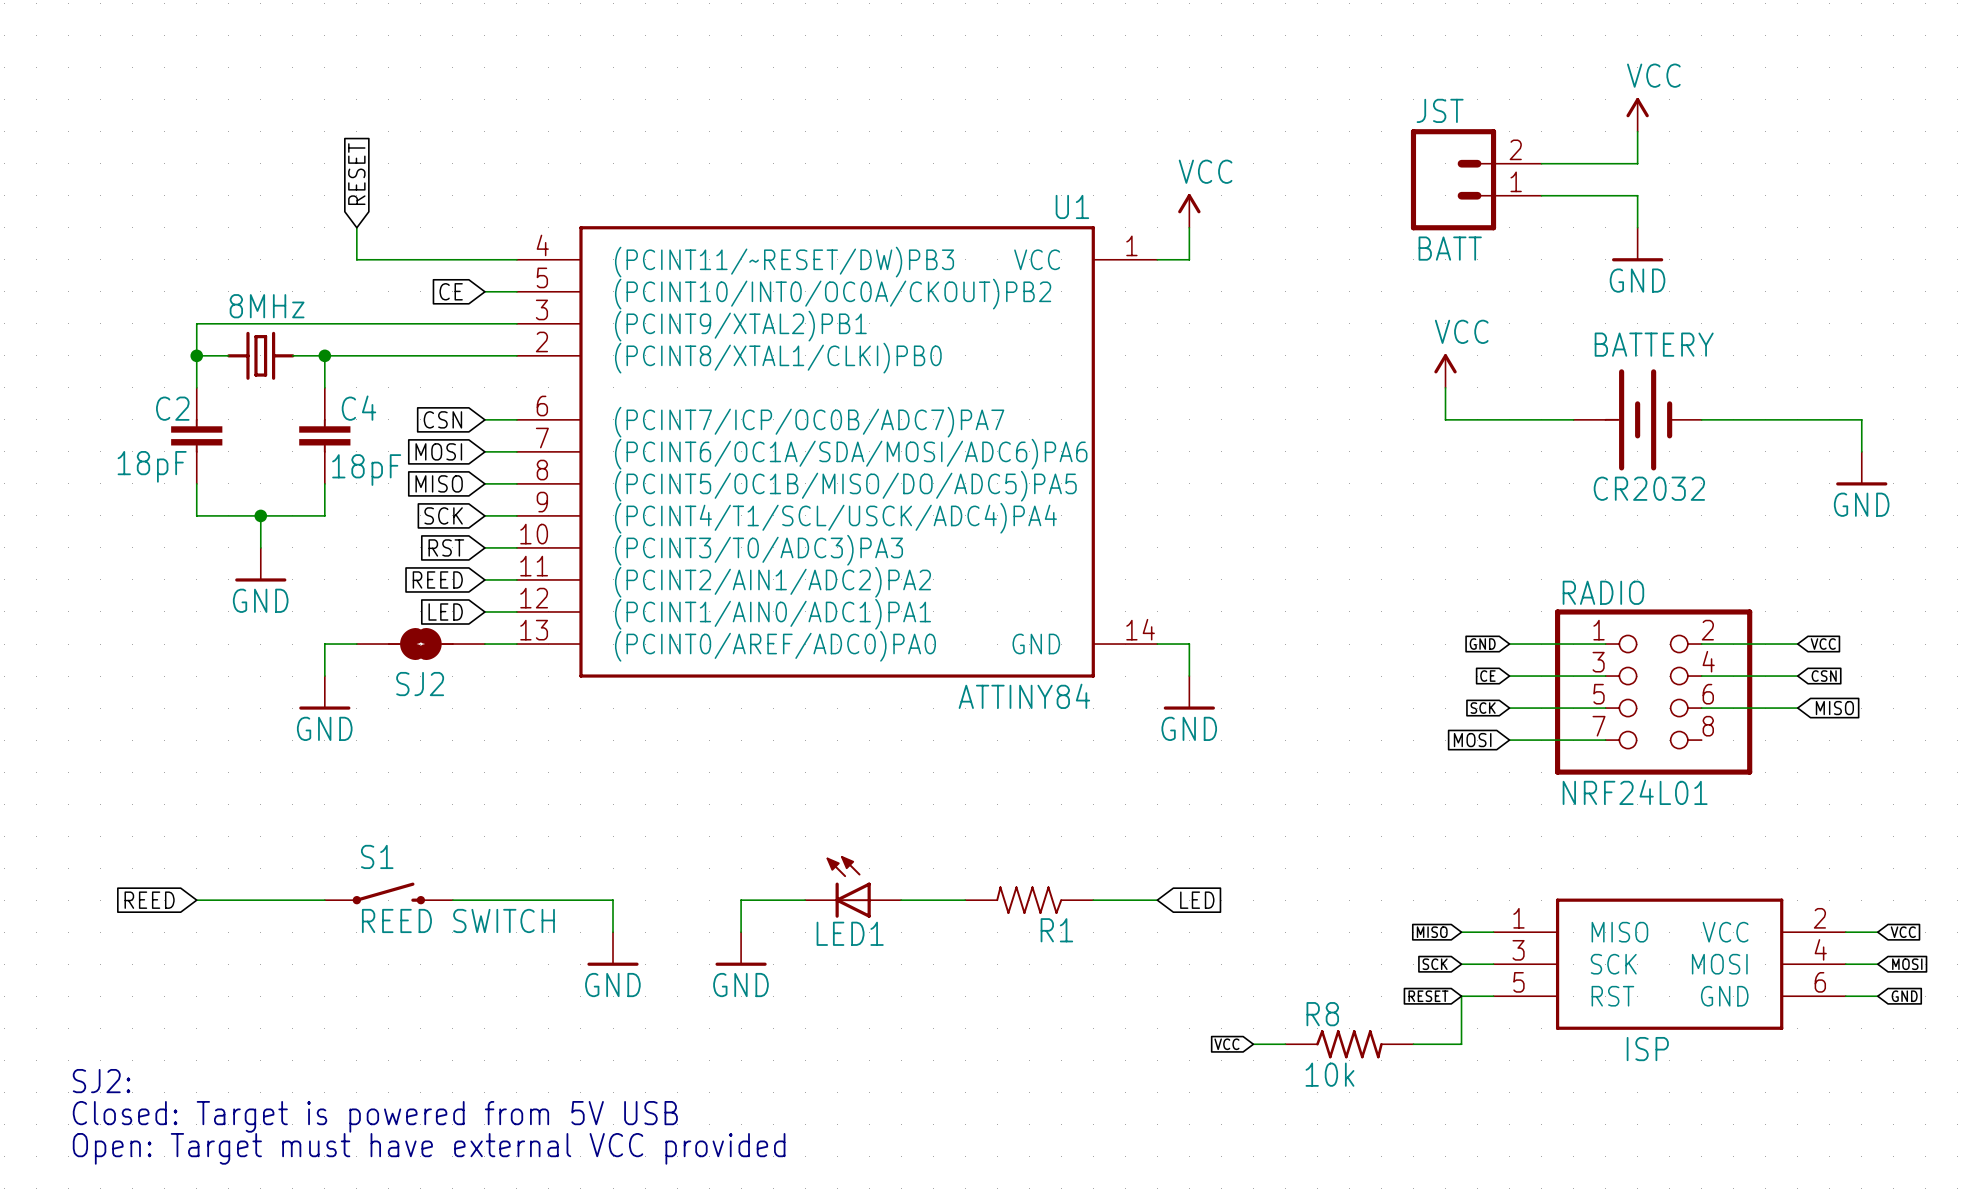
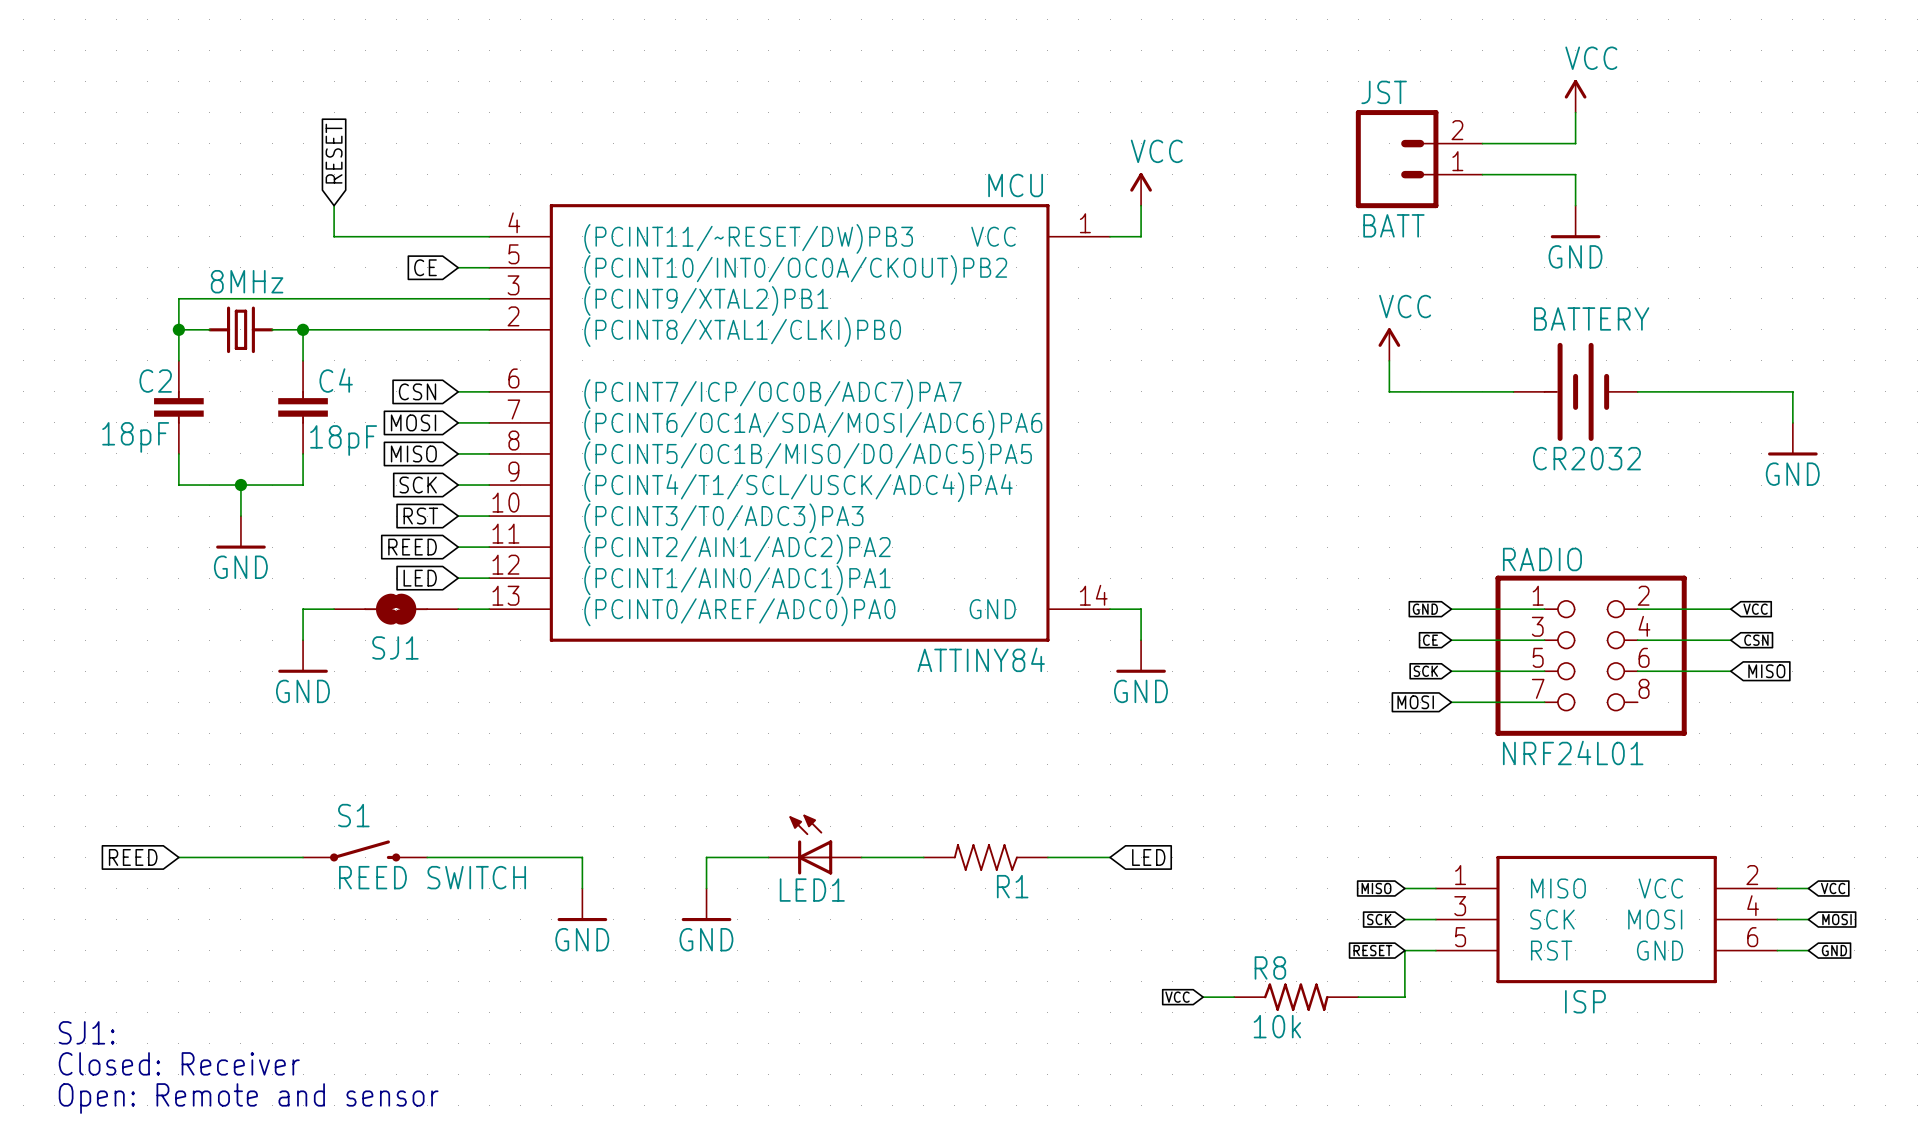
U1 name: U1 (1072, 206) -> MCU (1015, 185)
SJ2 name: SJ2 (420, 684) -> SJ1 (395, 647)
text: SJ2: (101, 1081) -> SJ1: (86, 1032)
text: Closed: Target is powered from 5V USB (375, 1116) -> Closed: Receiver (179, 1063)
text: Open: Target must have external VCC provided (429, 1148) -> Open: Remote and sensor (248, 1098)

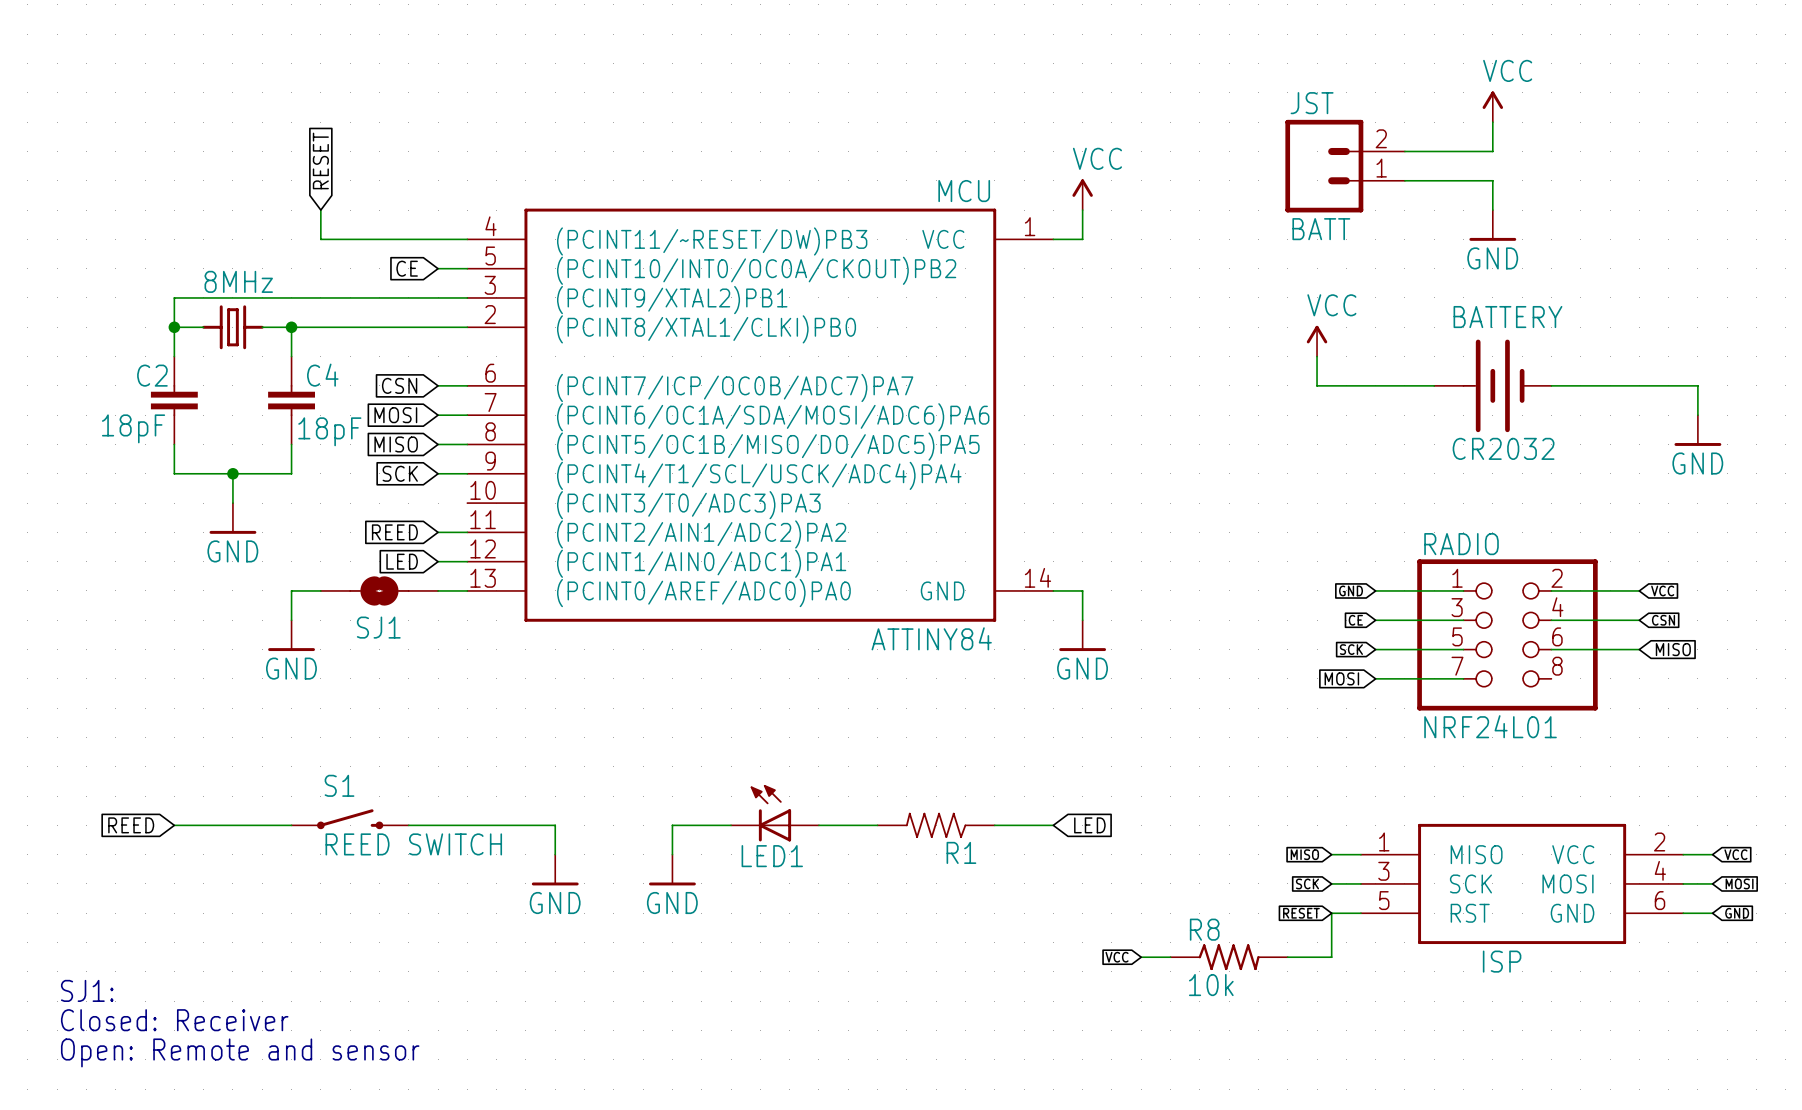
global label: RST (420, 516) -> none
wire: (458, 516) (489, 516) -> none

